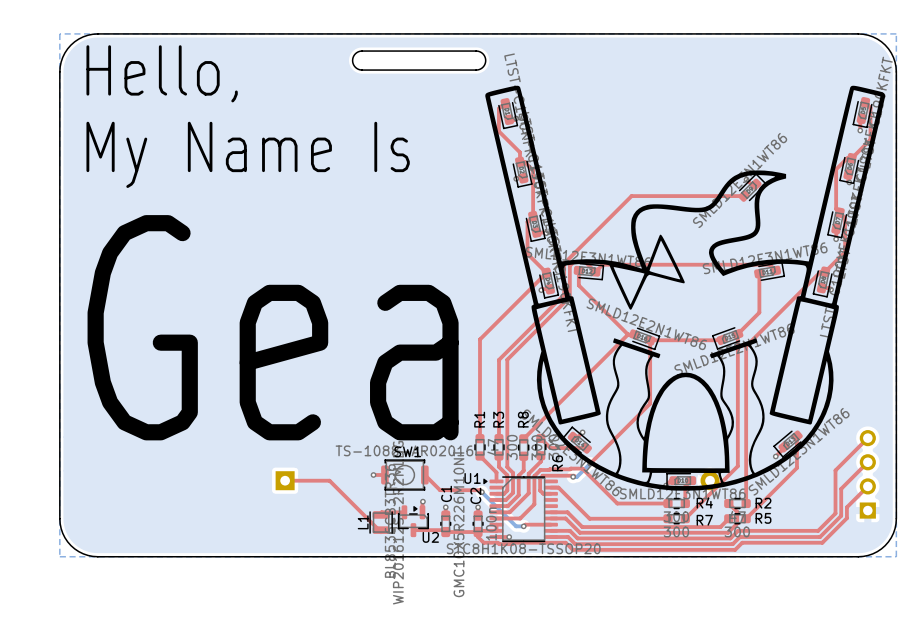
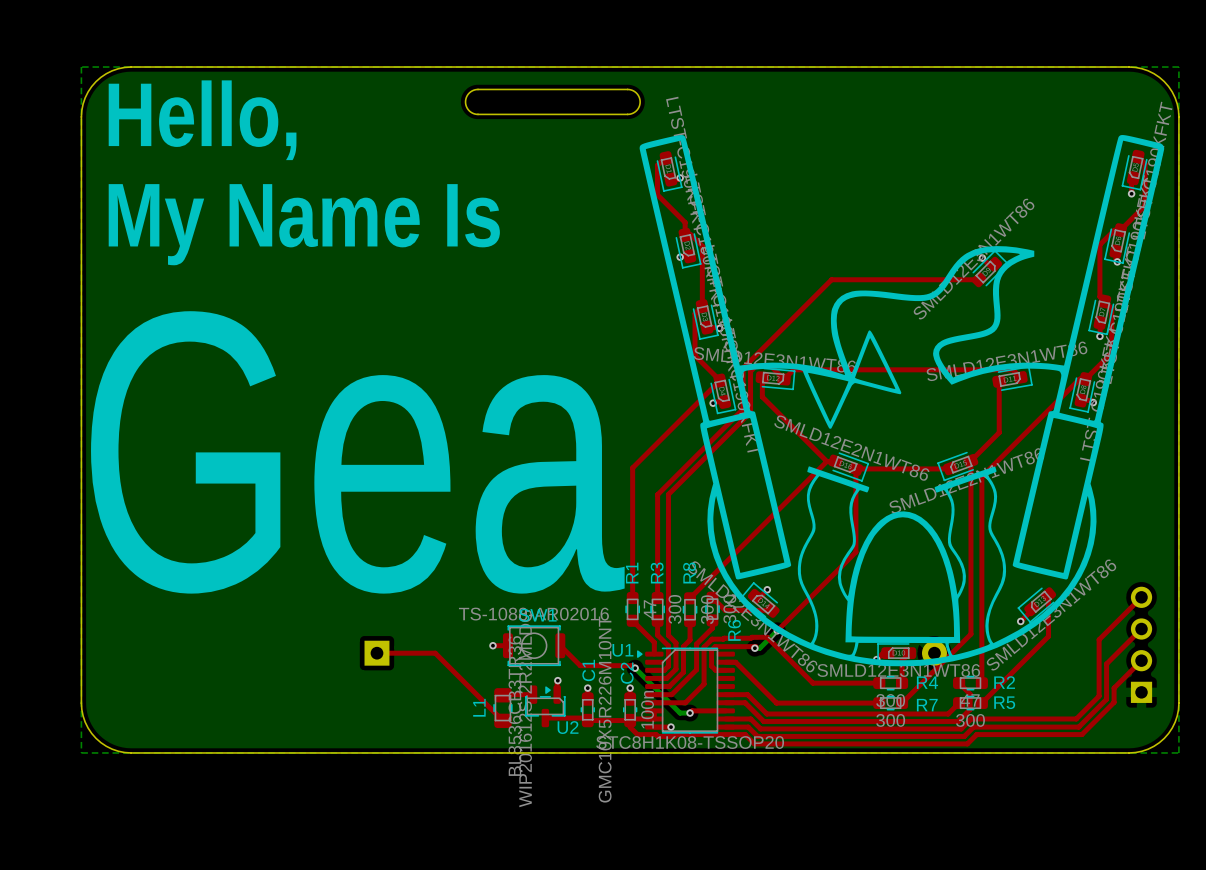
L1 footprint: [369, 511, 393, 534] -> [493, 688, 513, 729]

